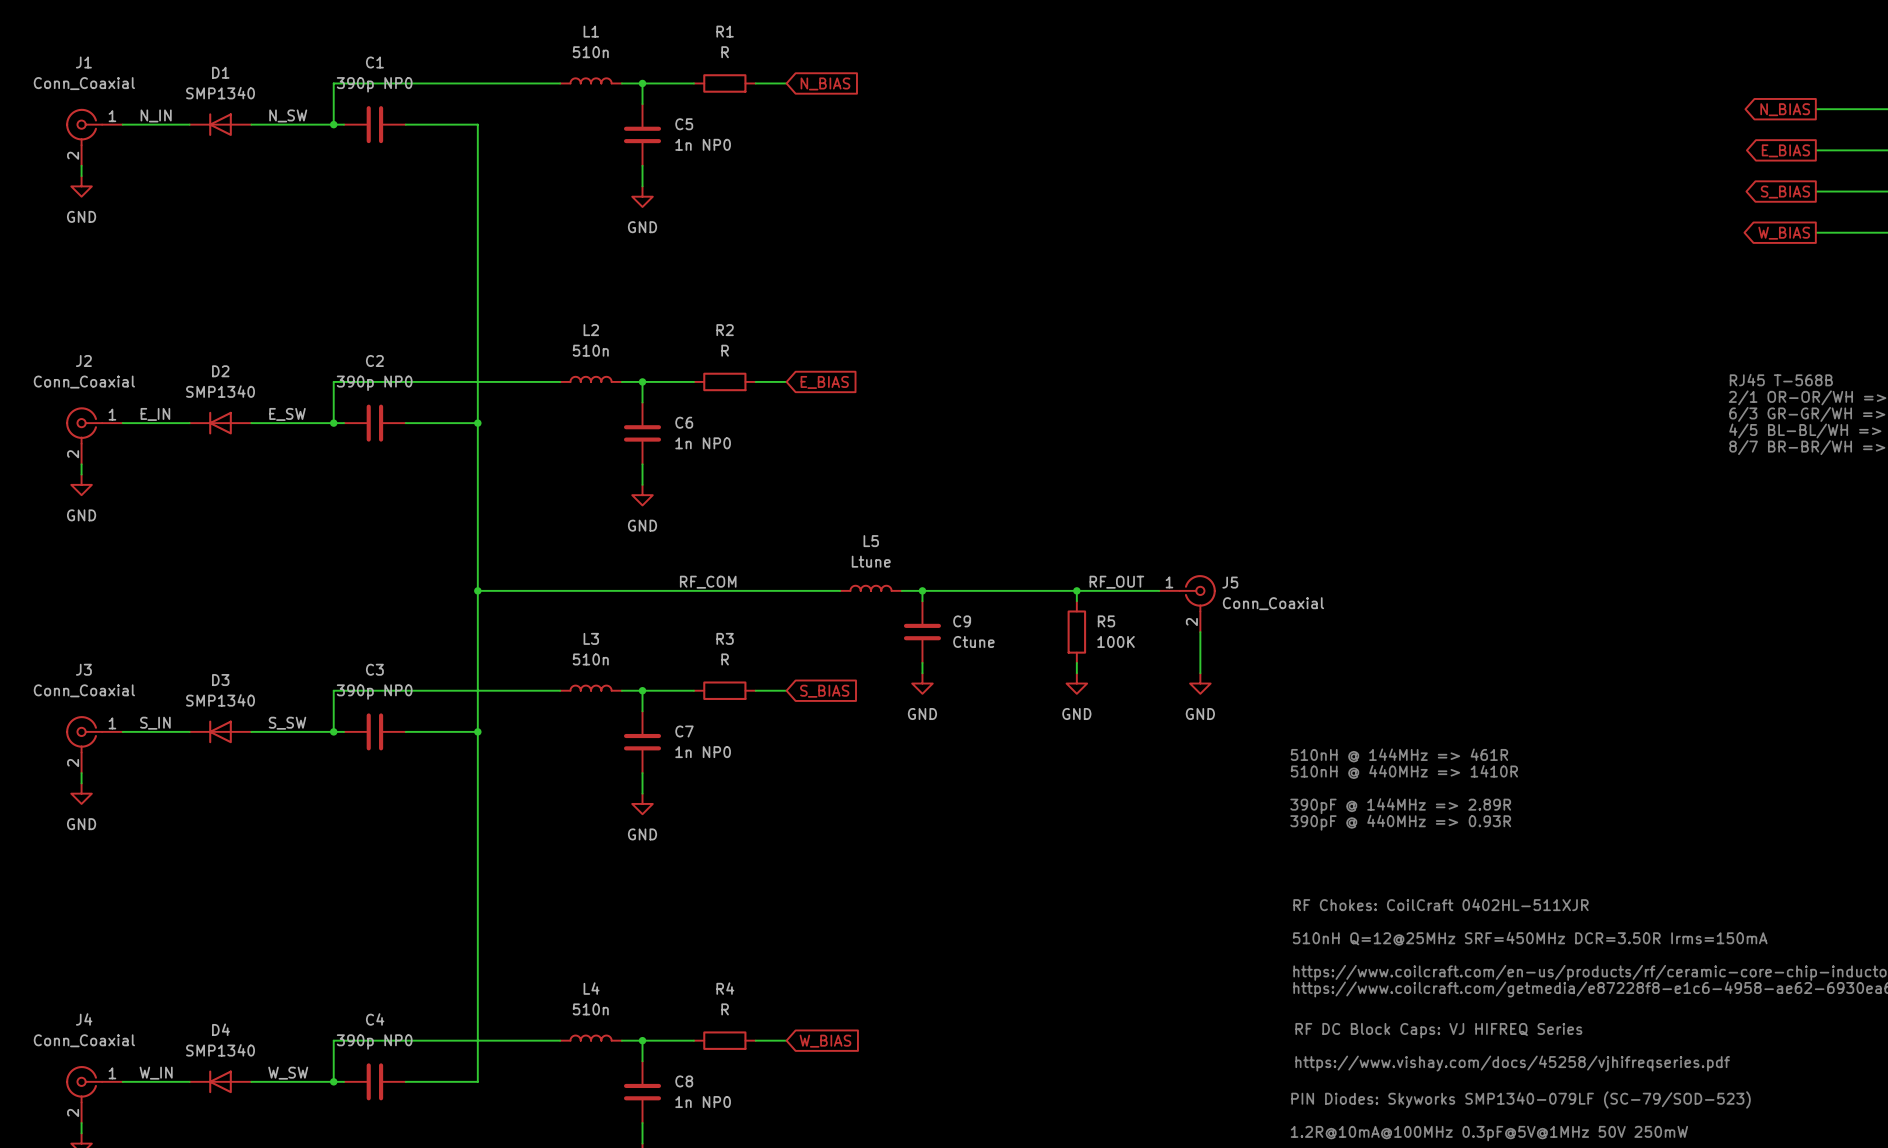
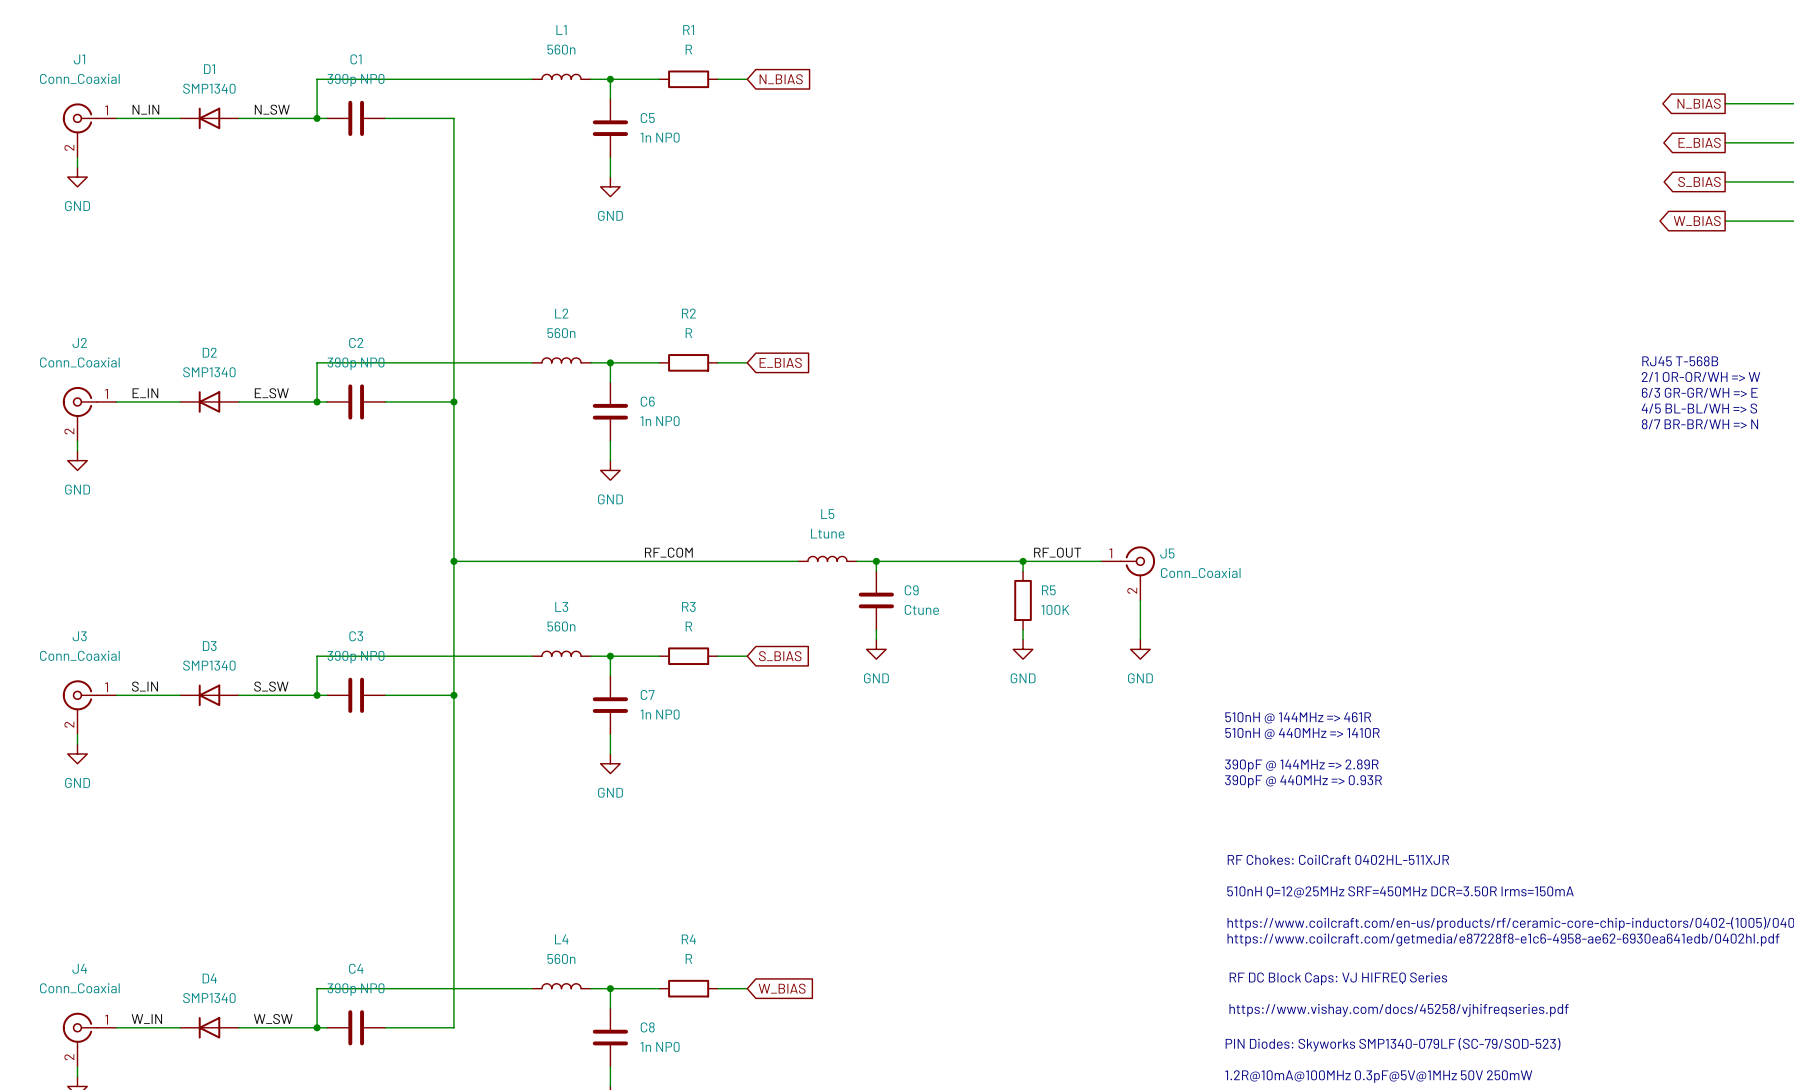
L1 value: 510n (590, 52) -> 560n (561, 49)
L2 value: 510n (590, 350) -> 560n (561, 333)
L3 value: 510n (590, 659) -> 560n (561, 626)
L4 value: 510n (590, 1009) -> 560n (561, 958)

